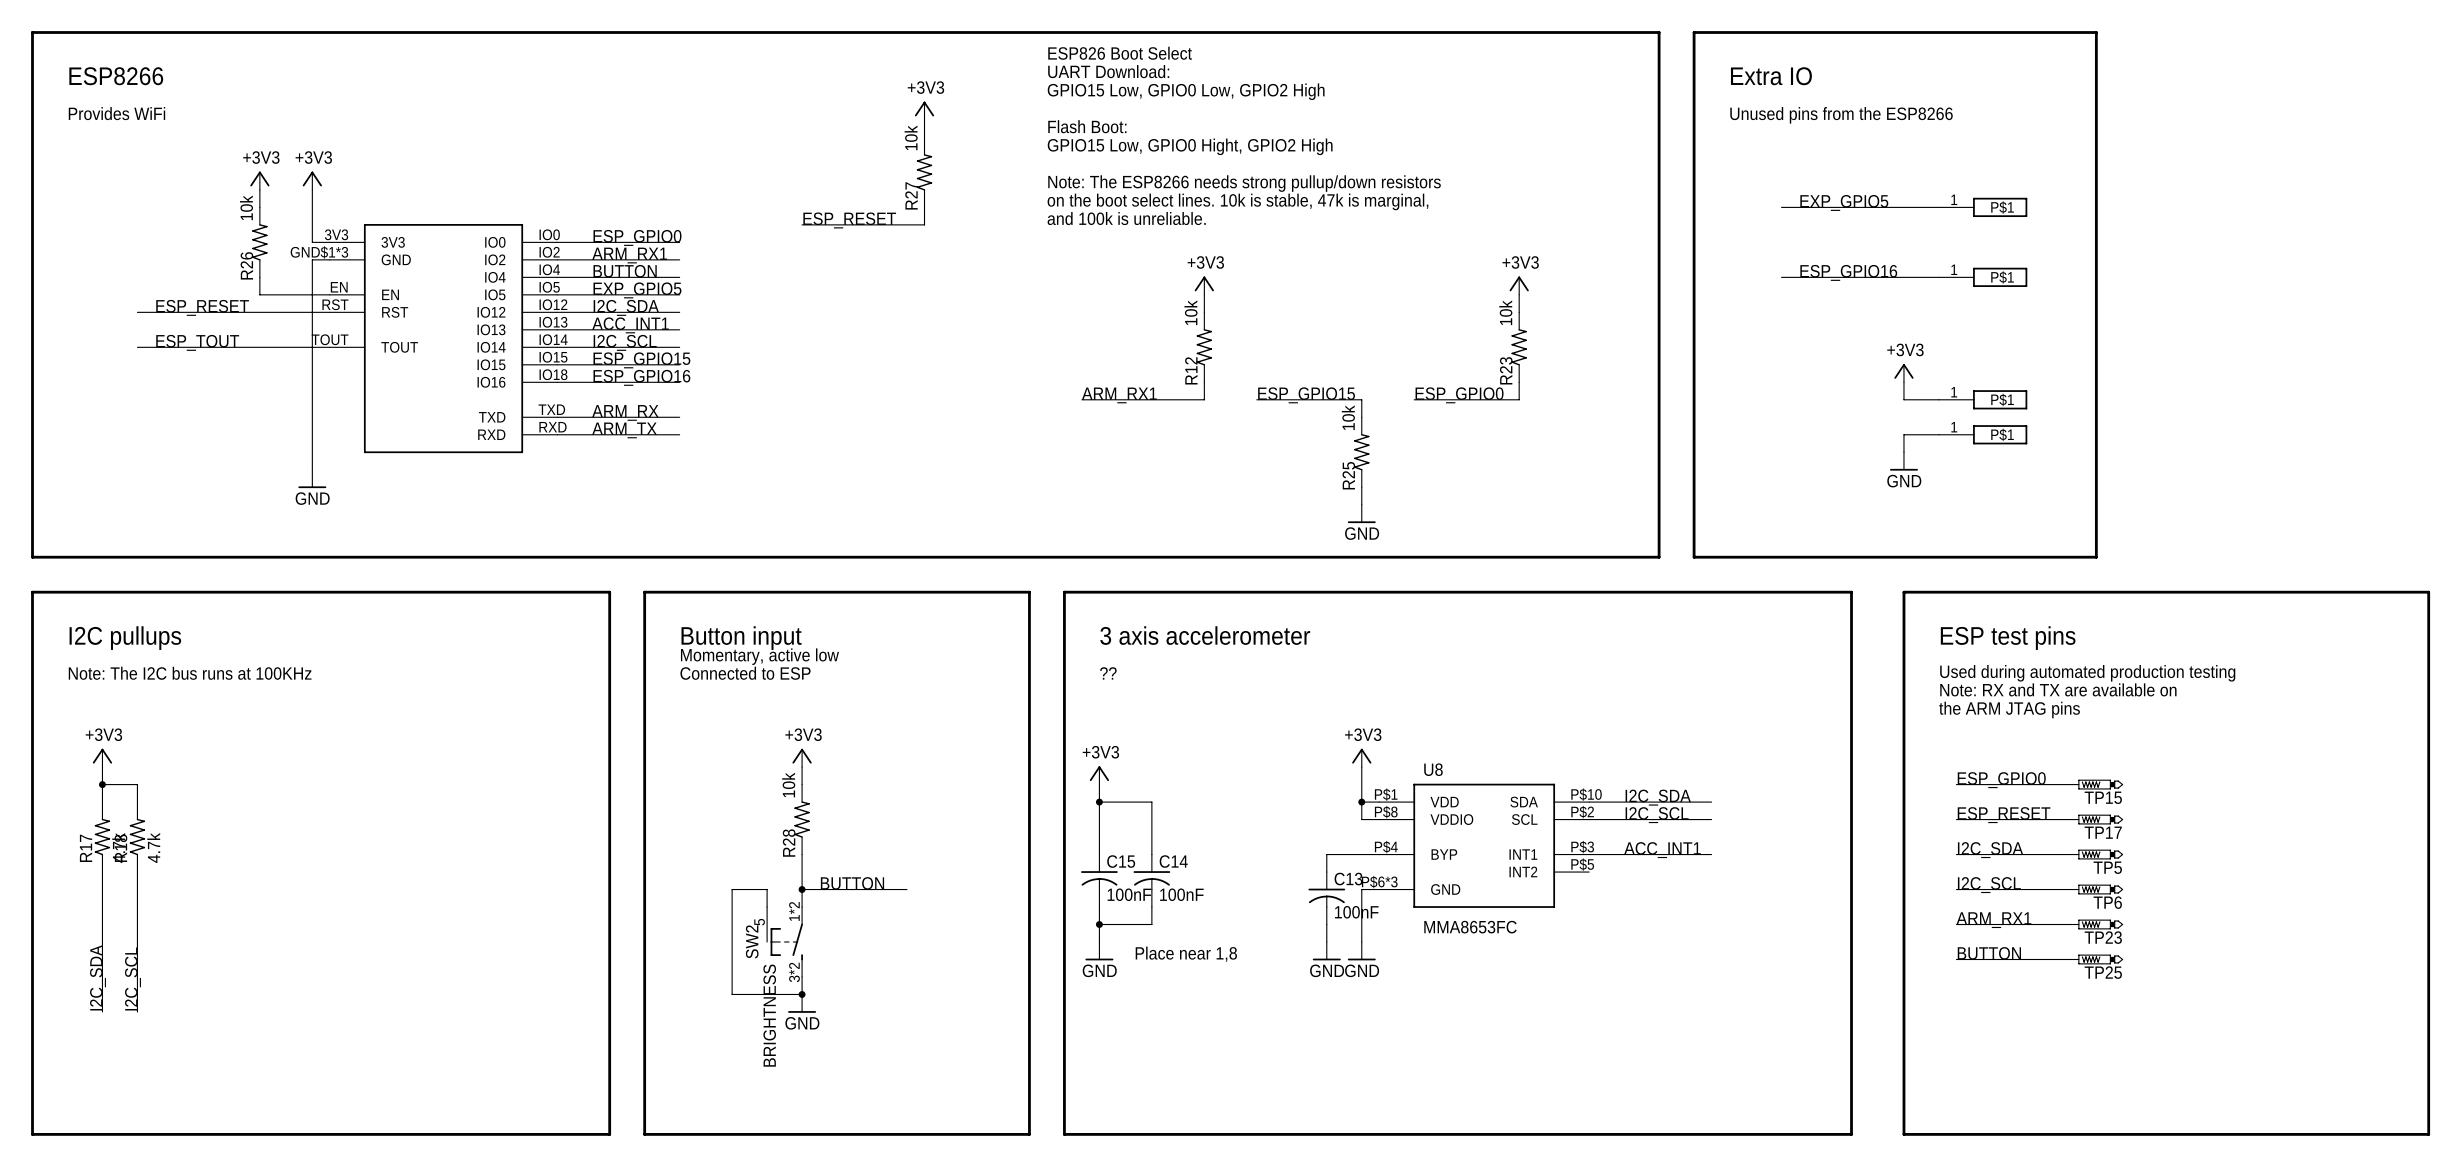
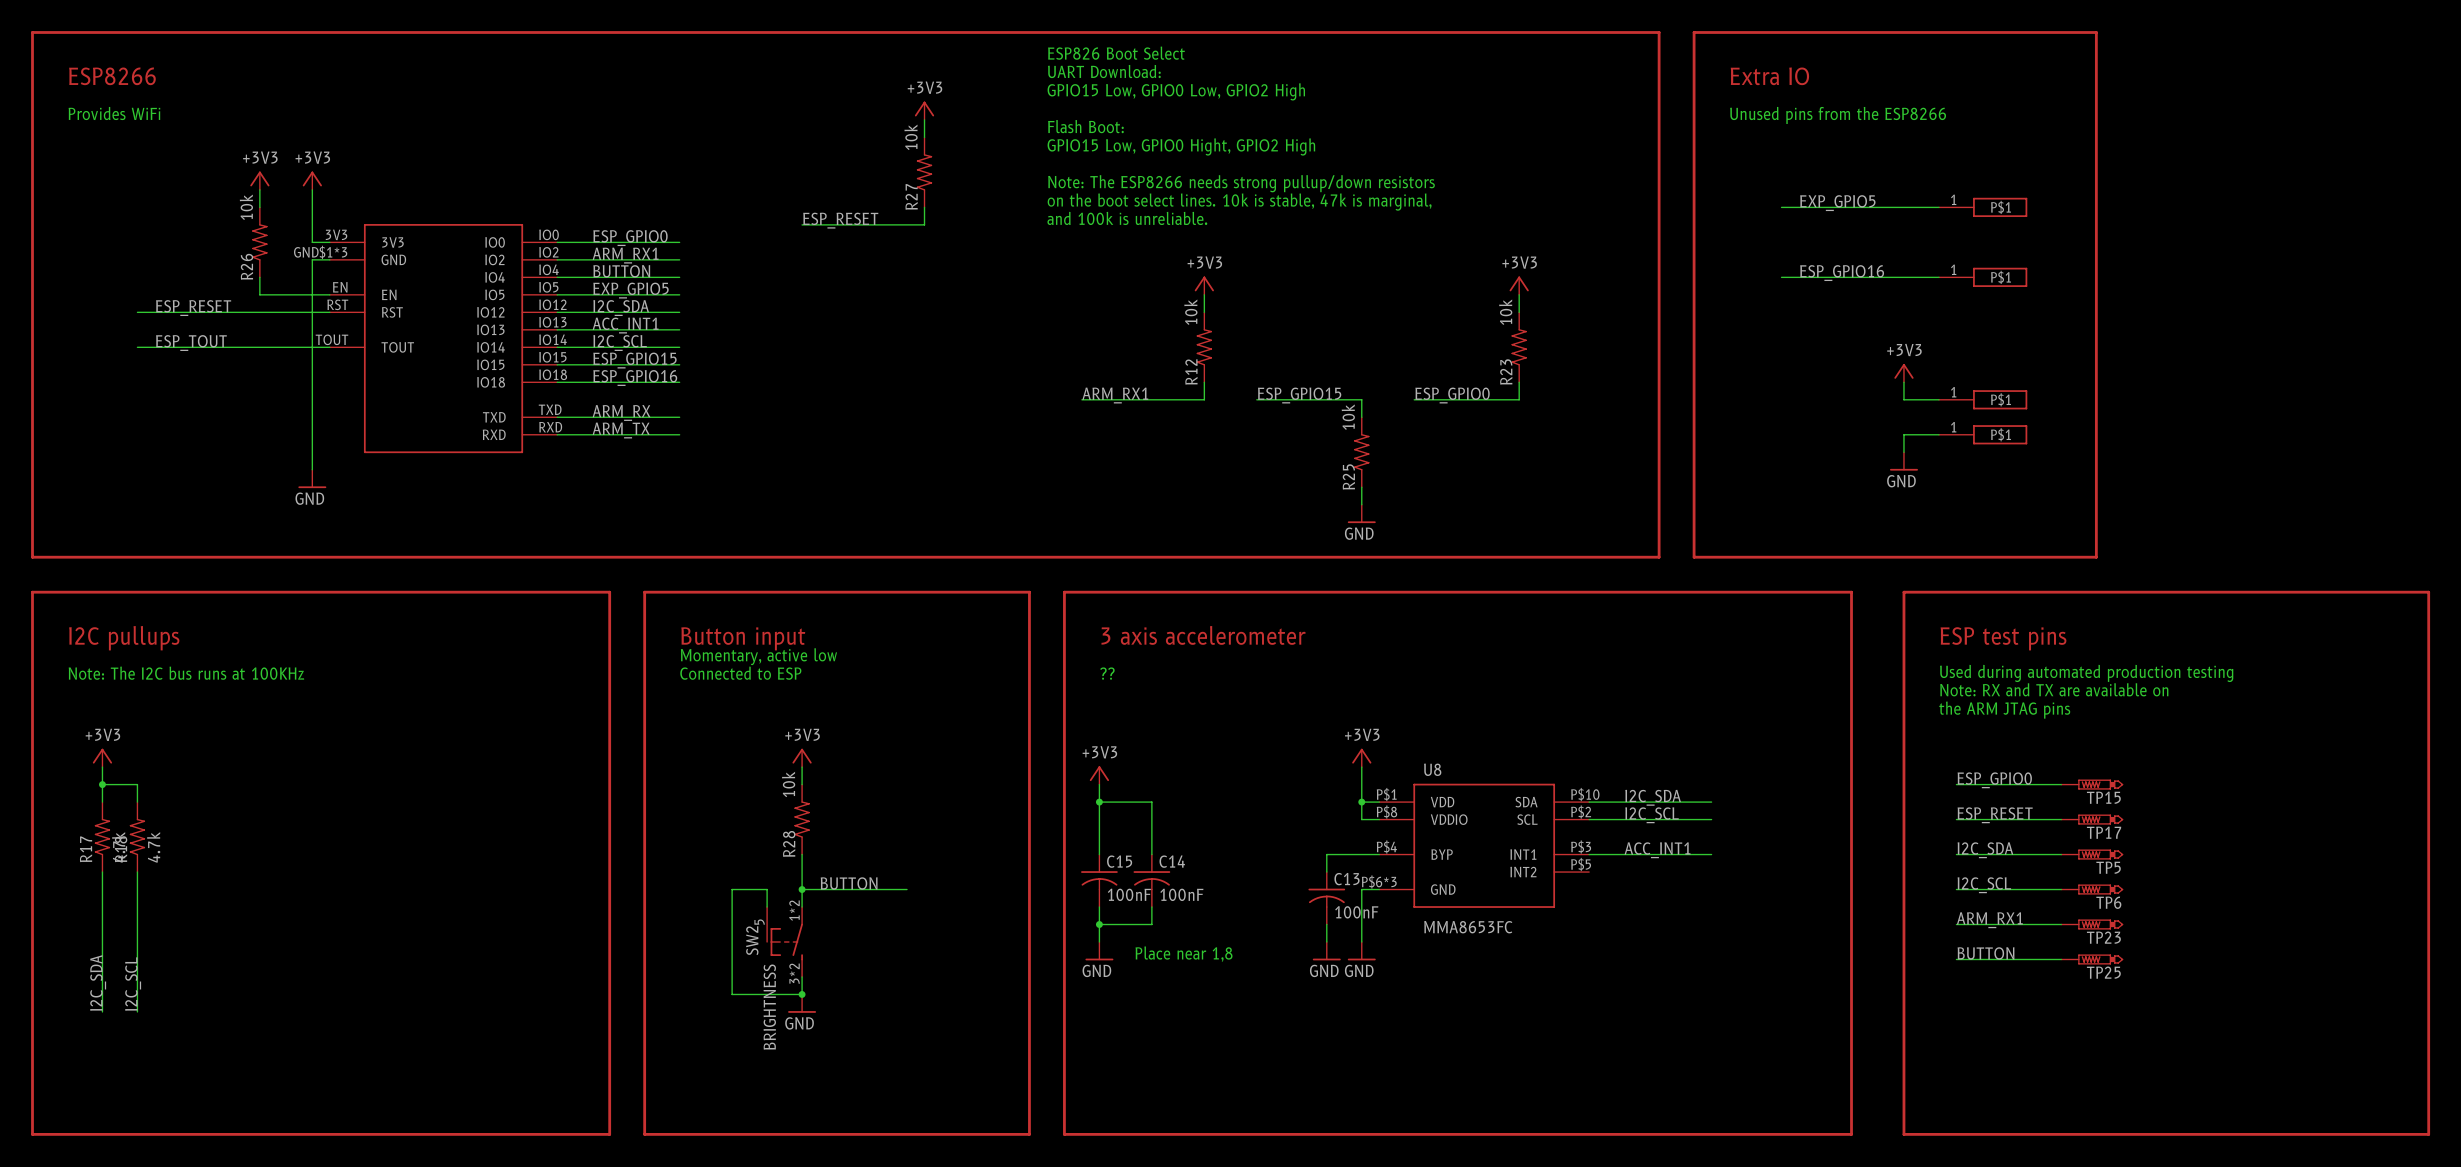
part pin name: IO16 (491, 382) -> IO18 (491, 382)

